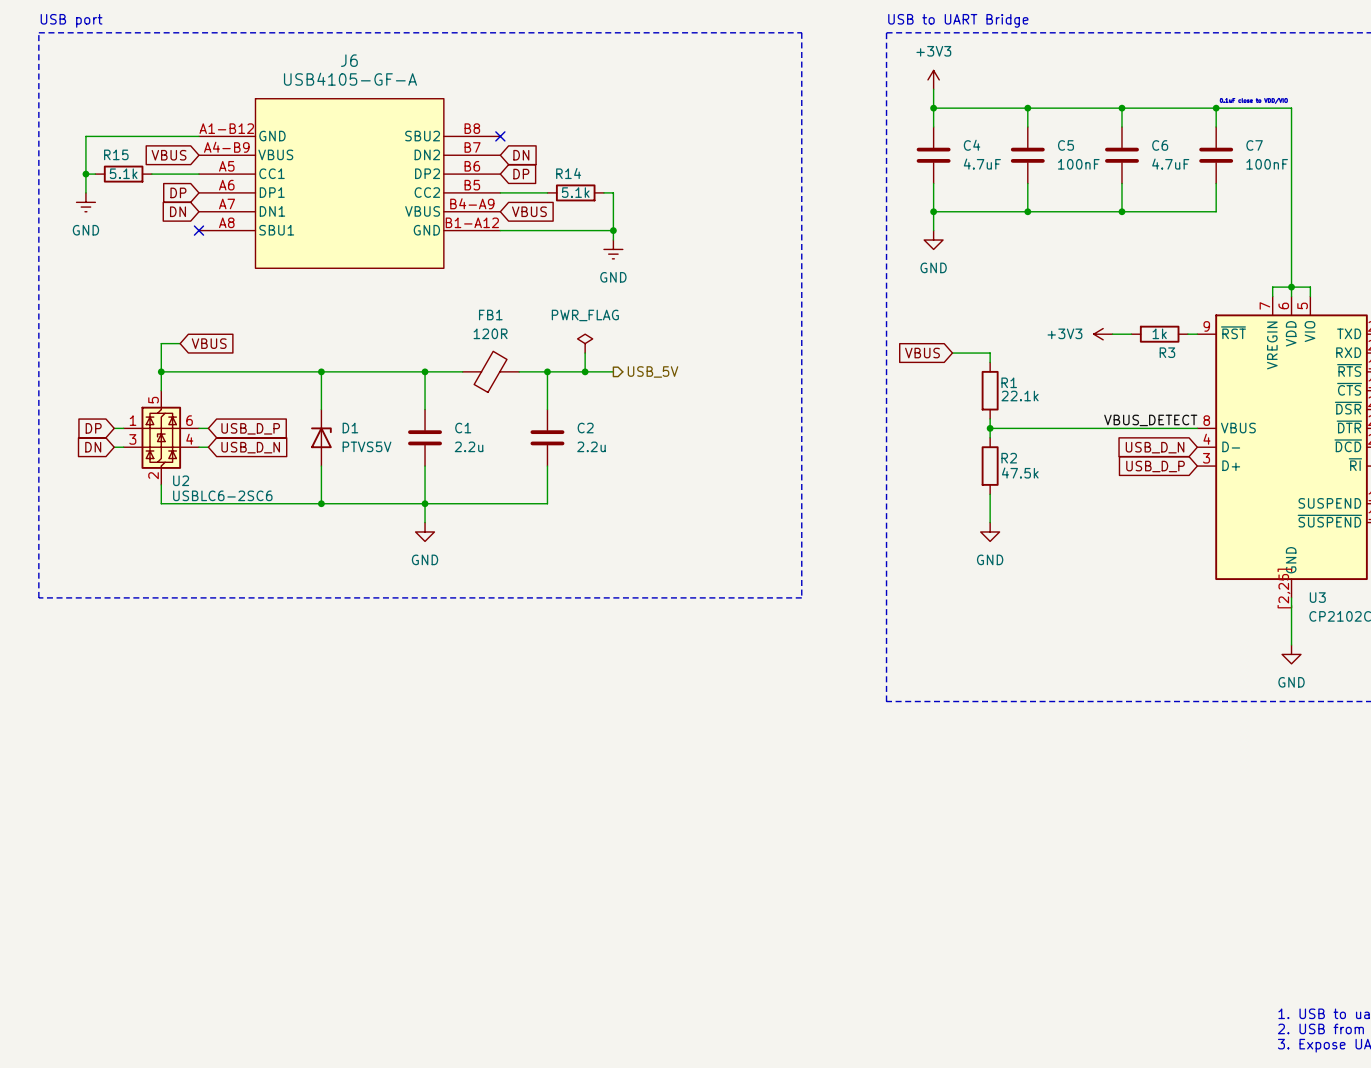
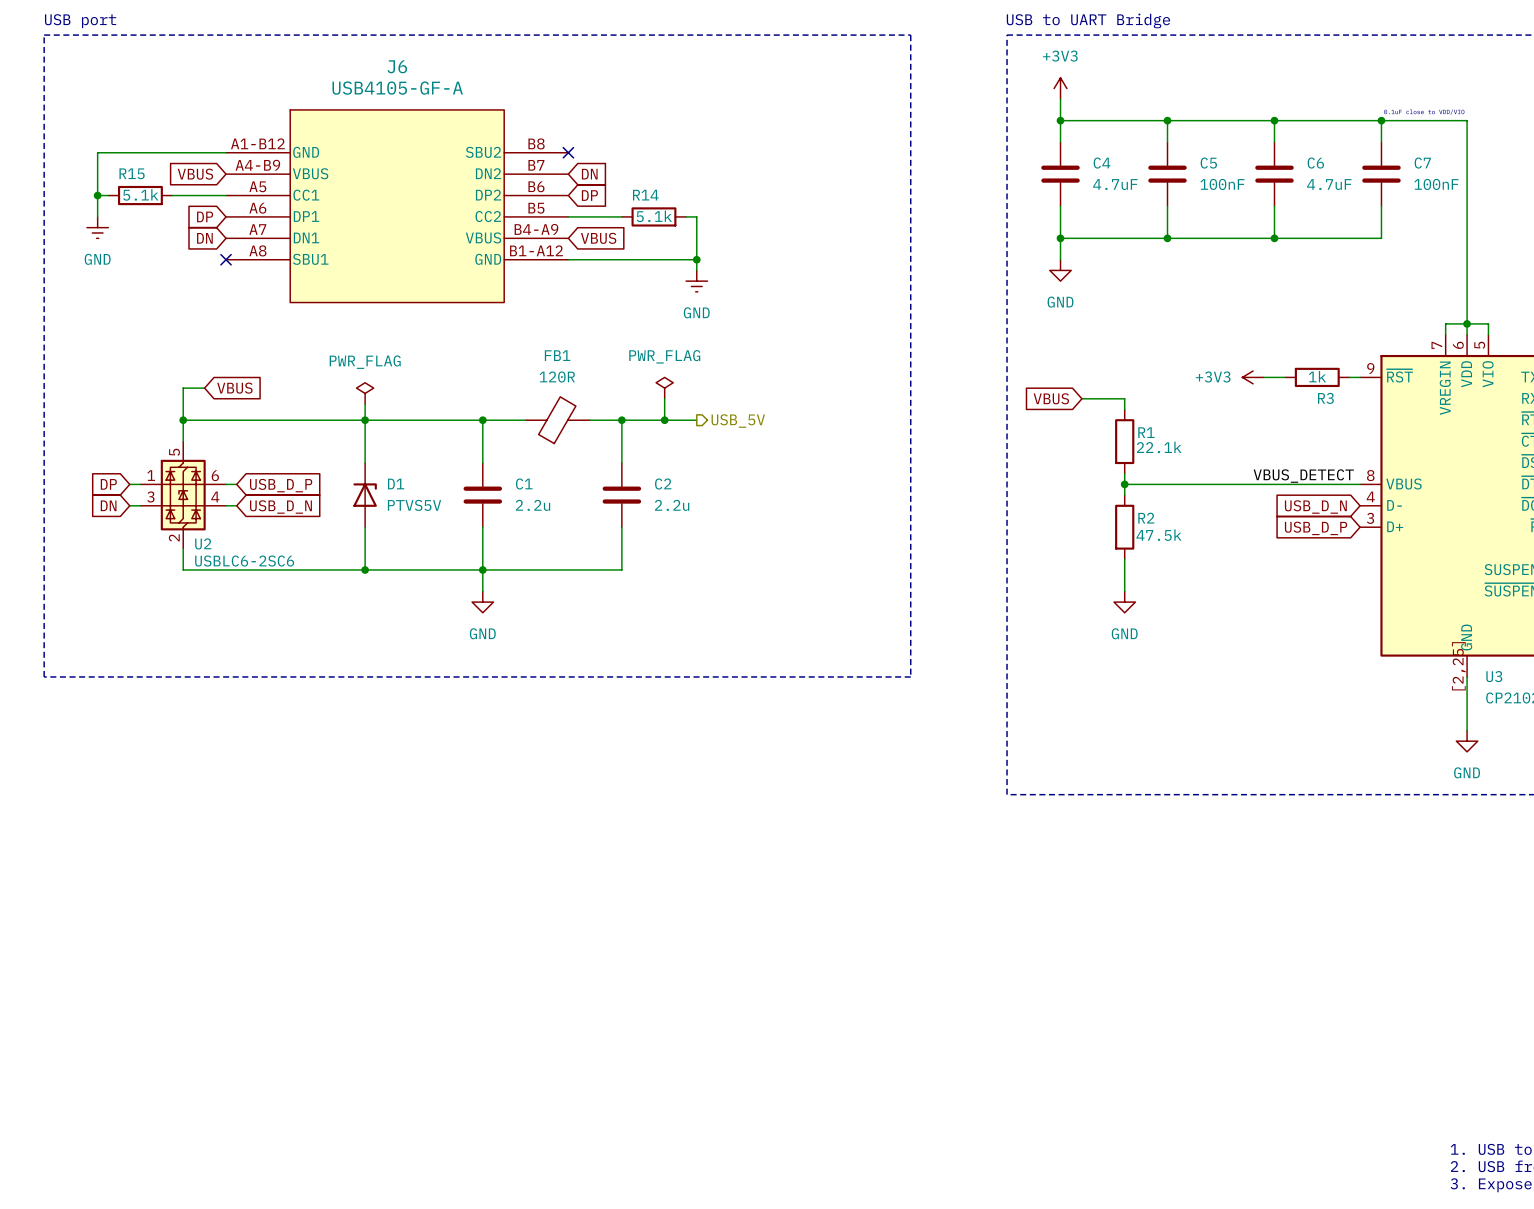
power symbol: none -> PWR_FLAG (365, 393)
wire: none -> (365, 404) (365, 420)

